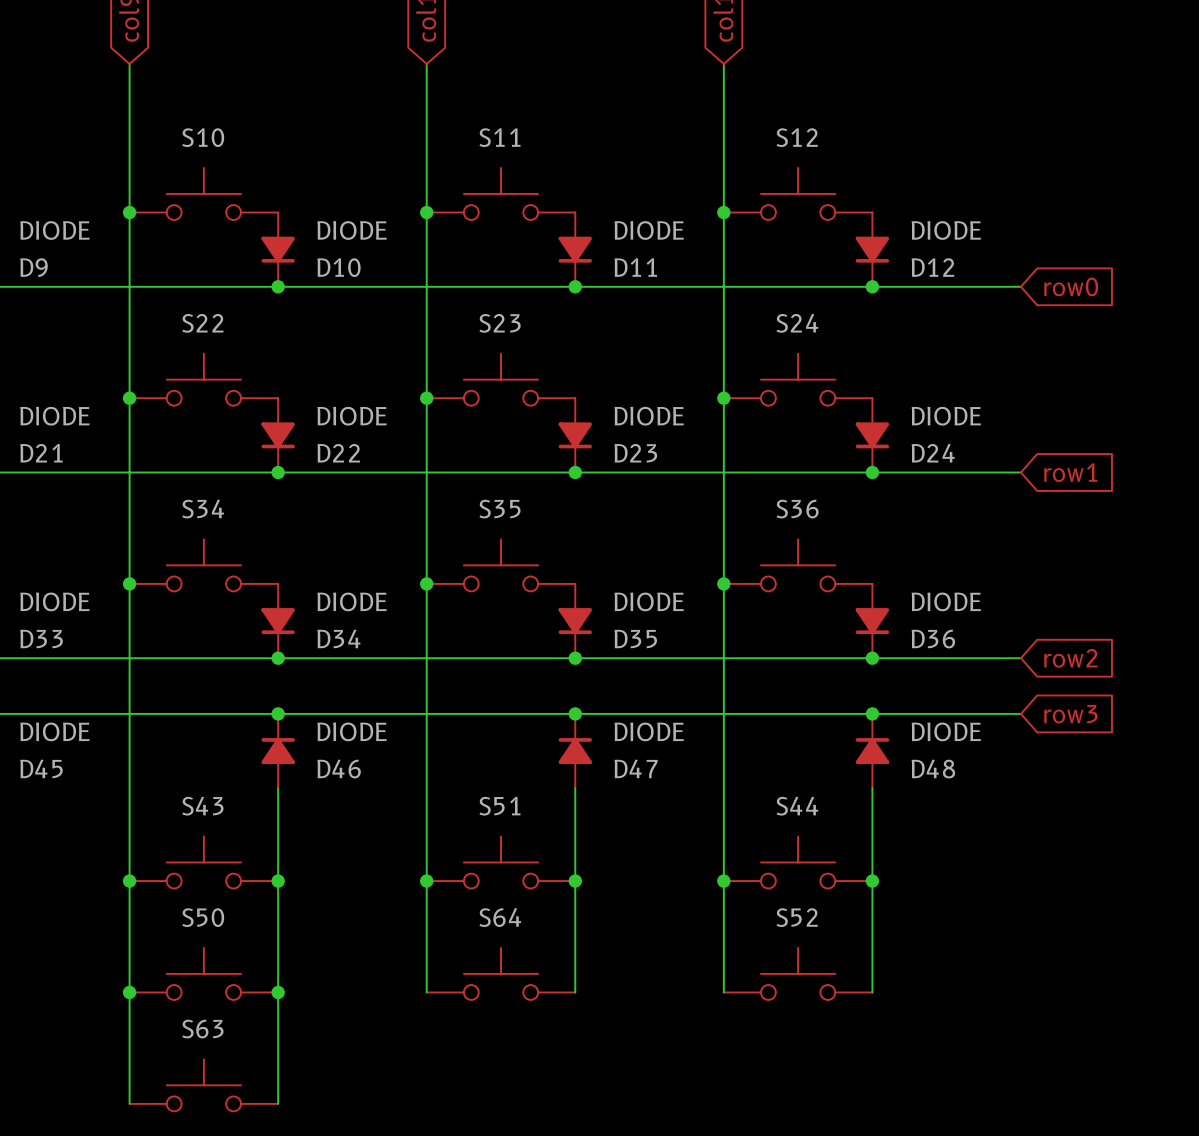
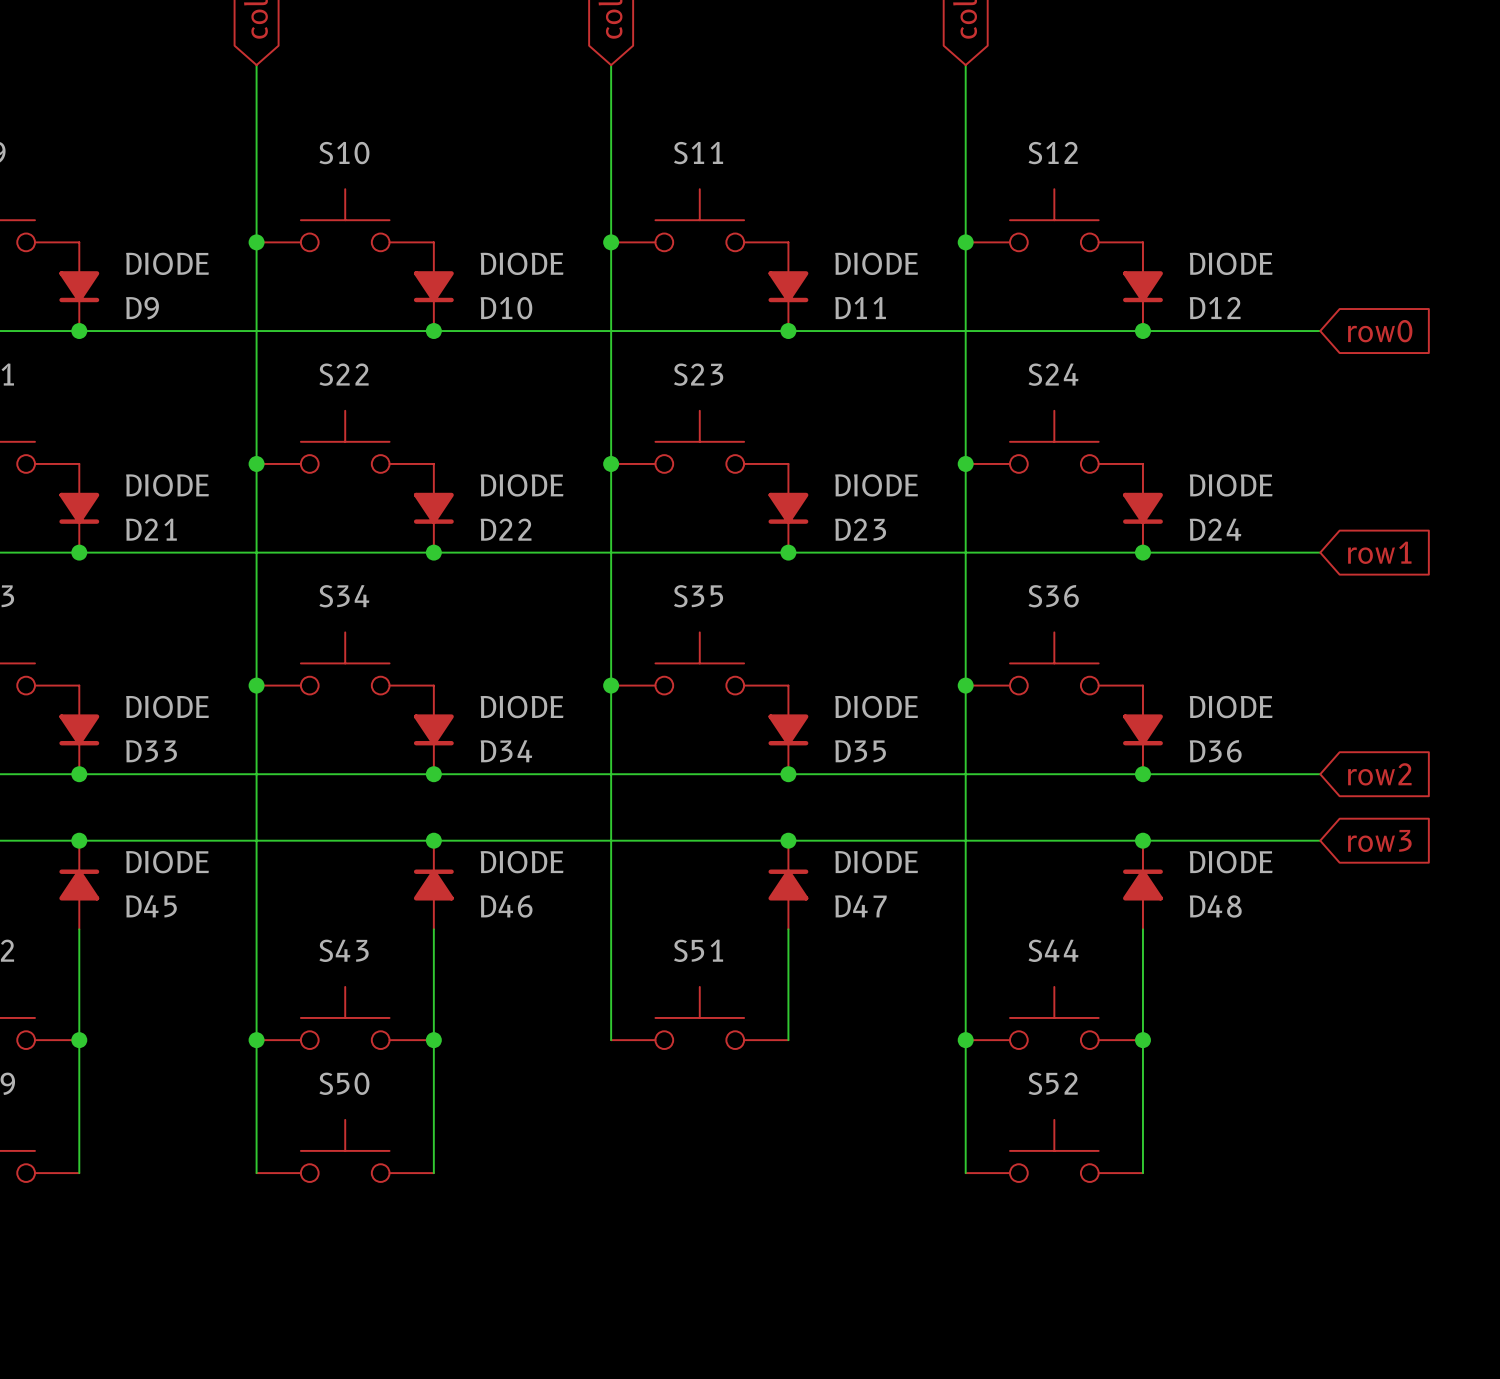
wire: (426, 881) (426, 992) -> none
junction: (426, 881) -> none
wire: (575, 881) (575, 992) -> none
junction: (575, 881) -> none
S64: (500, 973) -> none
wire: (129, 992) (129, 1103) -> none
junction: (129, 992) -> none
wire: (278, 992) (278, 1103) -> none
junction: (278, 992) -> none
S63: (203, 1085) -> none

